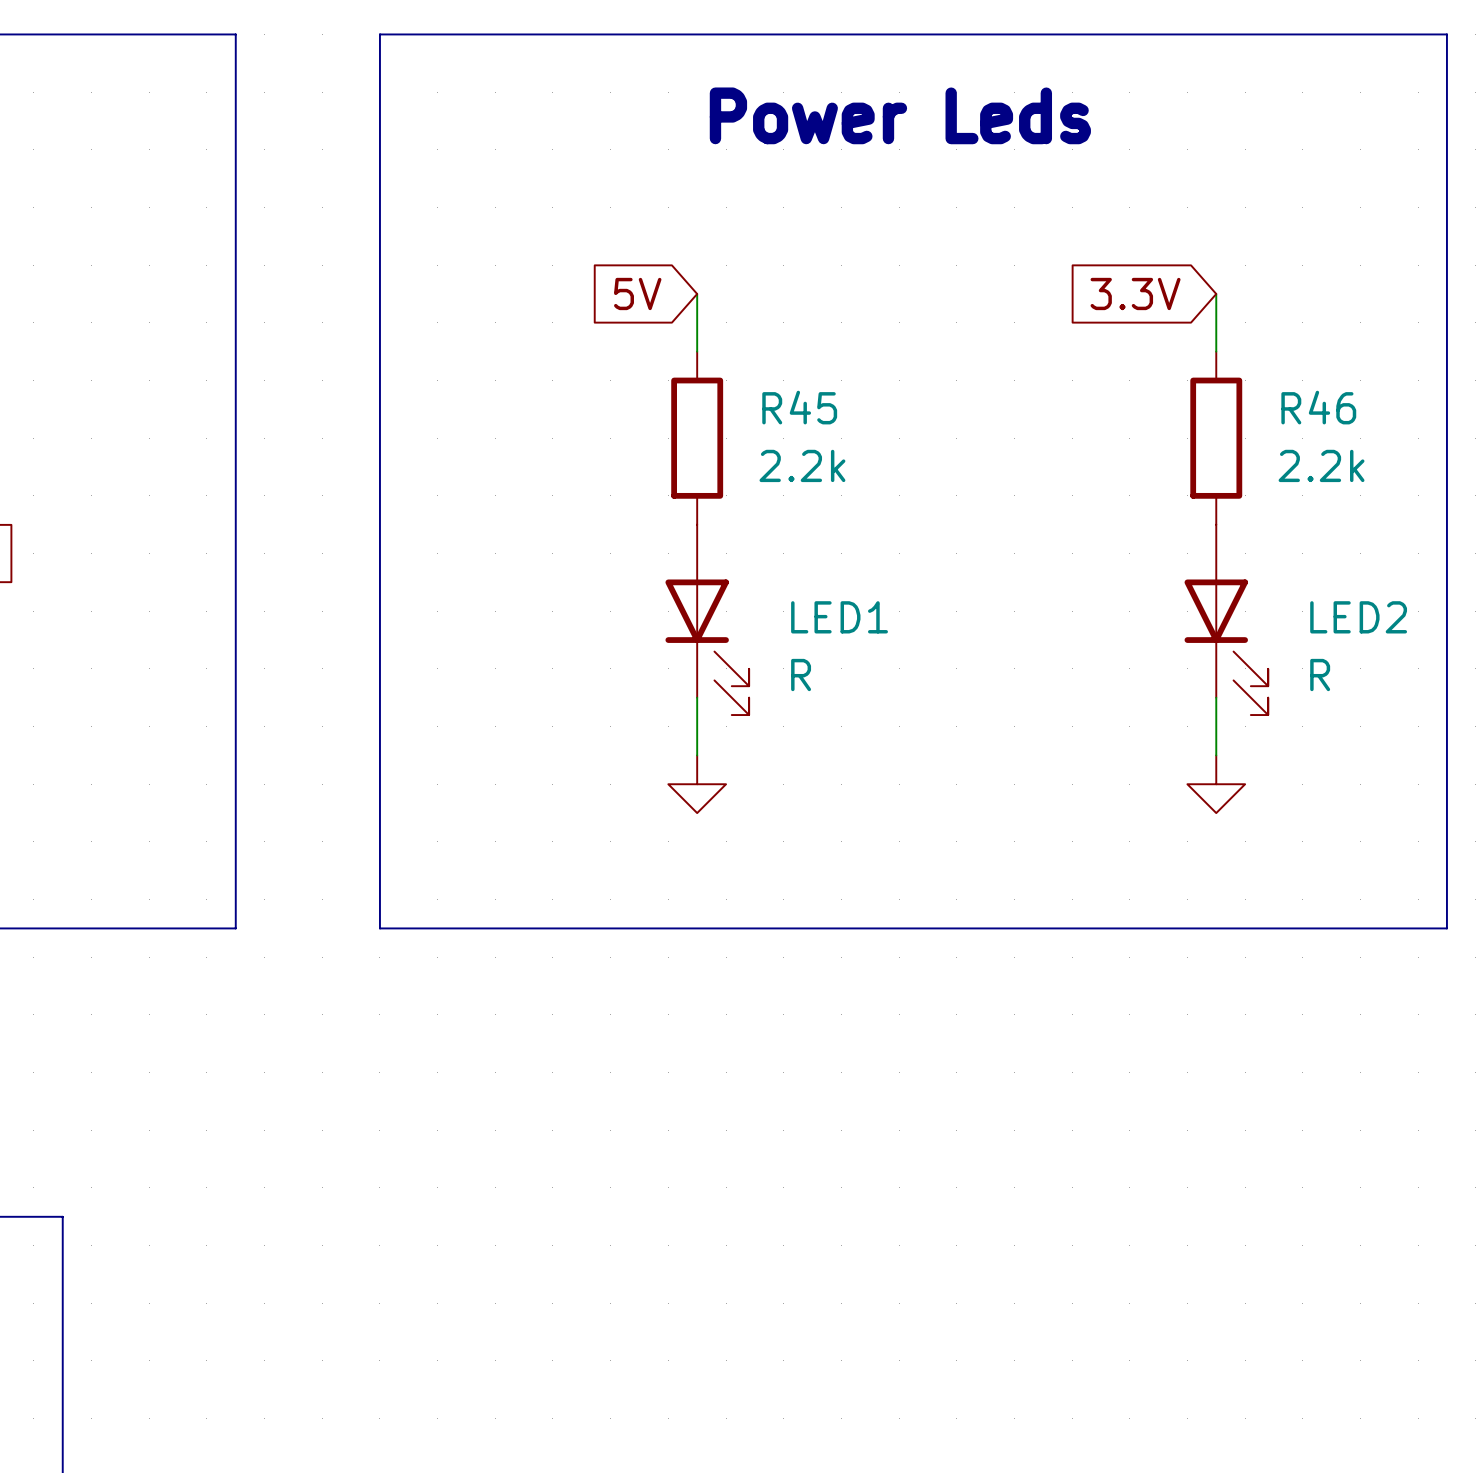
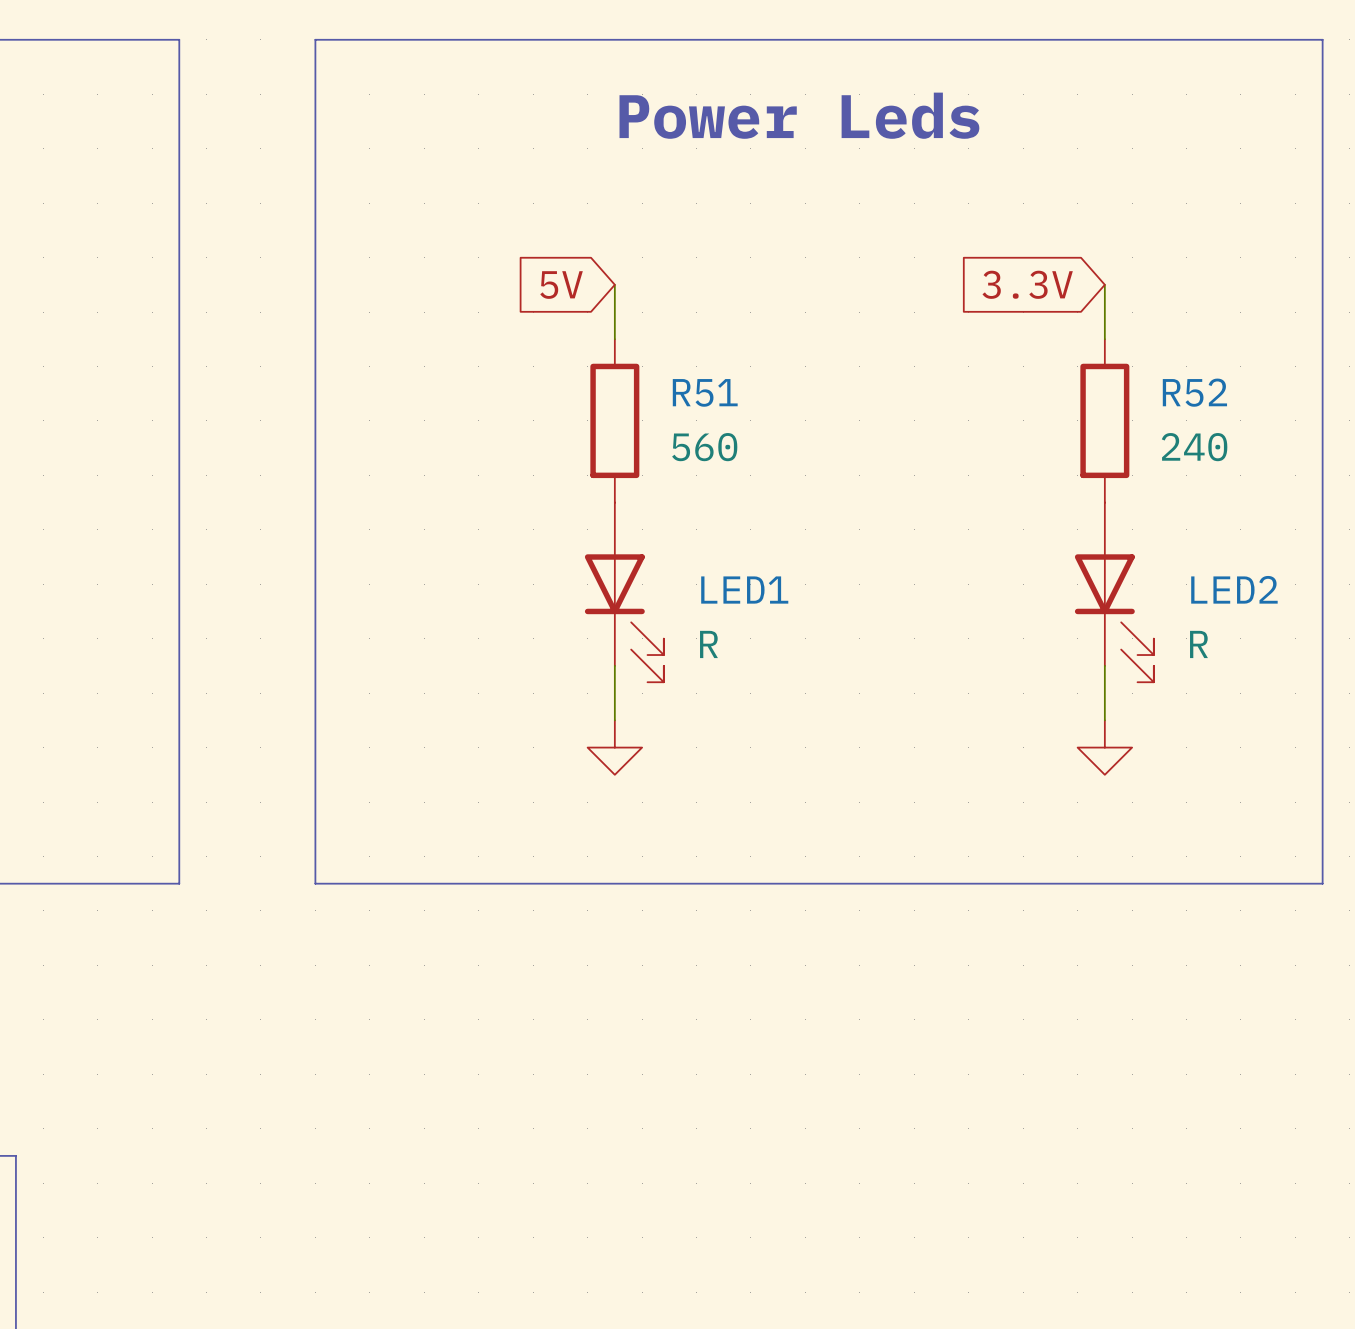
R45 name: R45 (799, 407) -> R51 (705, 392)
R46 name: R46 (1318, 407) -> R52 (1194, 392)
R45 value: 2.2k (802, 465) -> 560 (704, 447)
R46 value: 2.2k (1321, 465) -> 240 (1194, 447)

